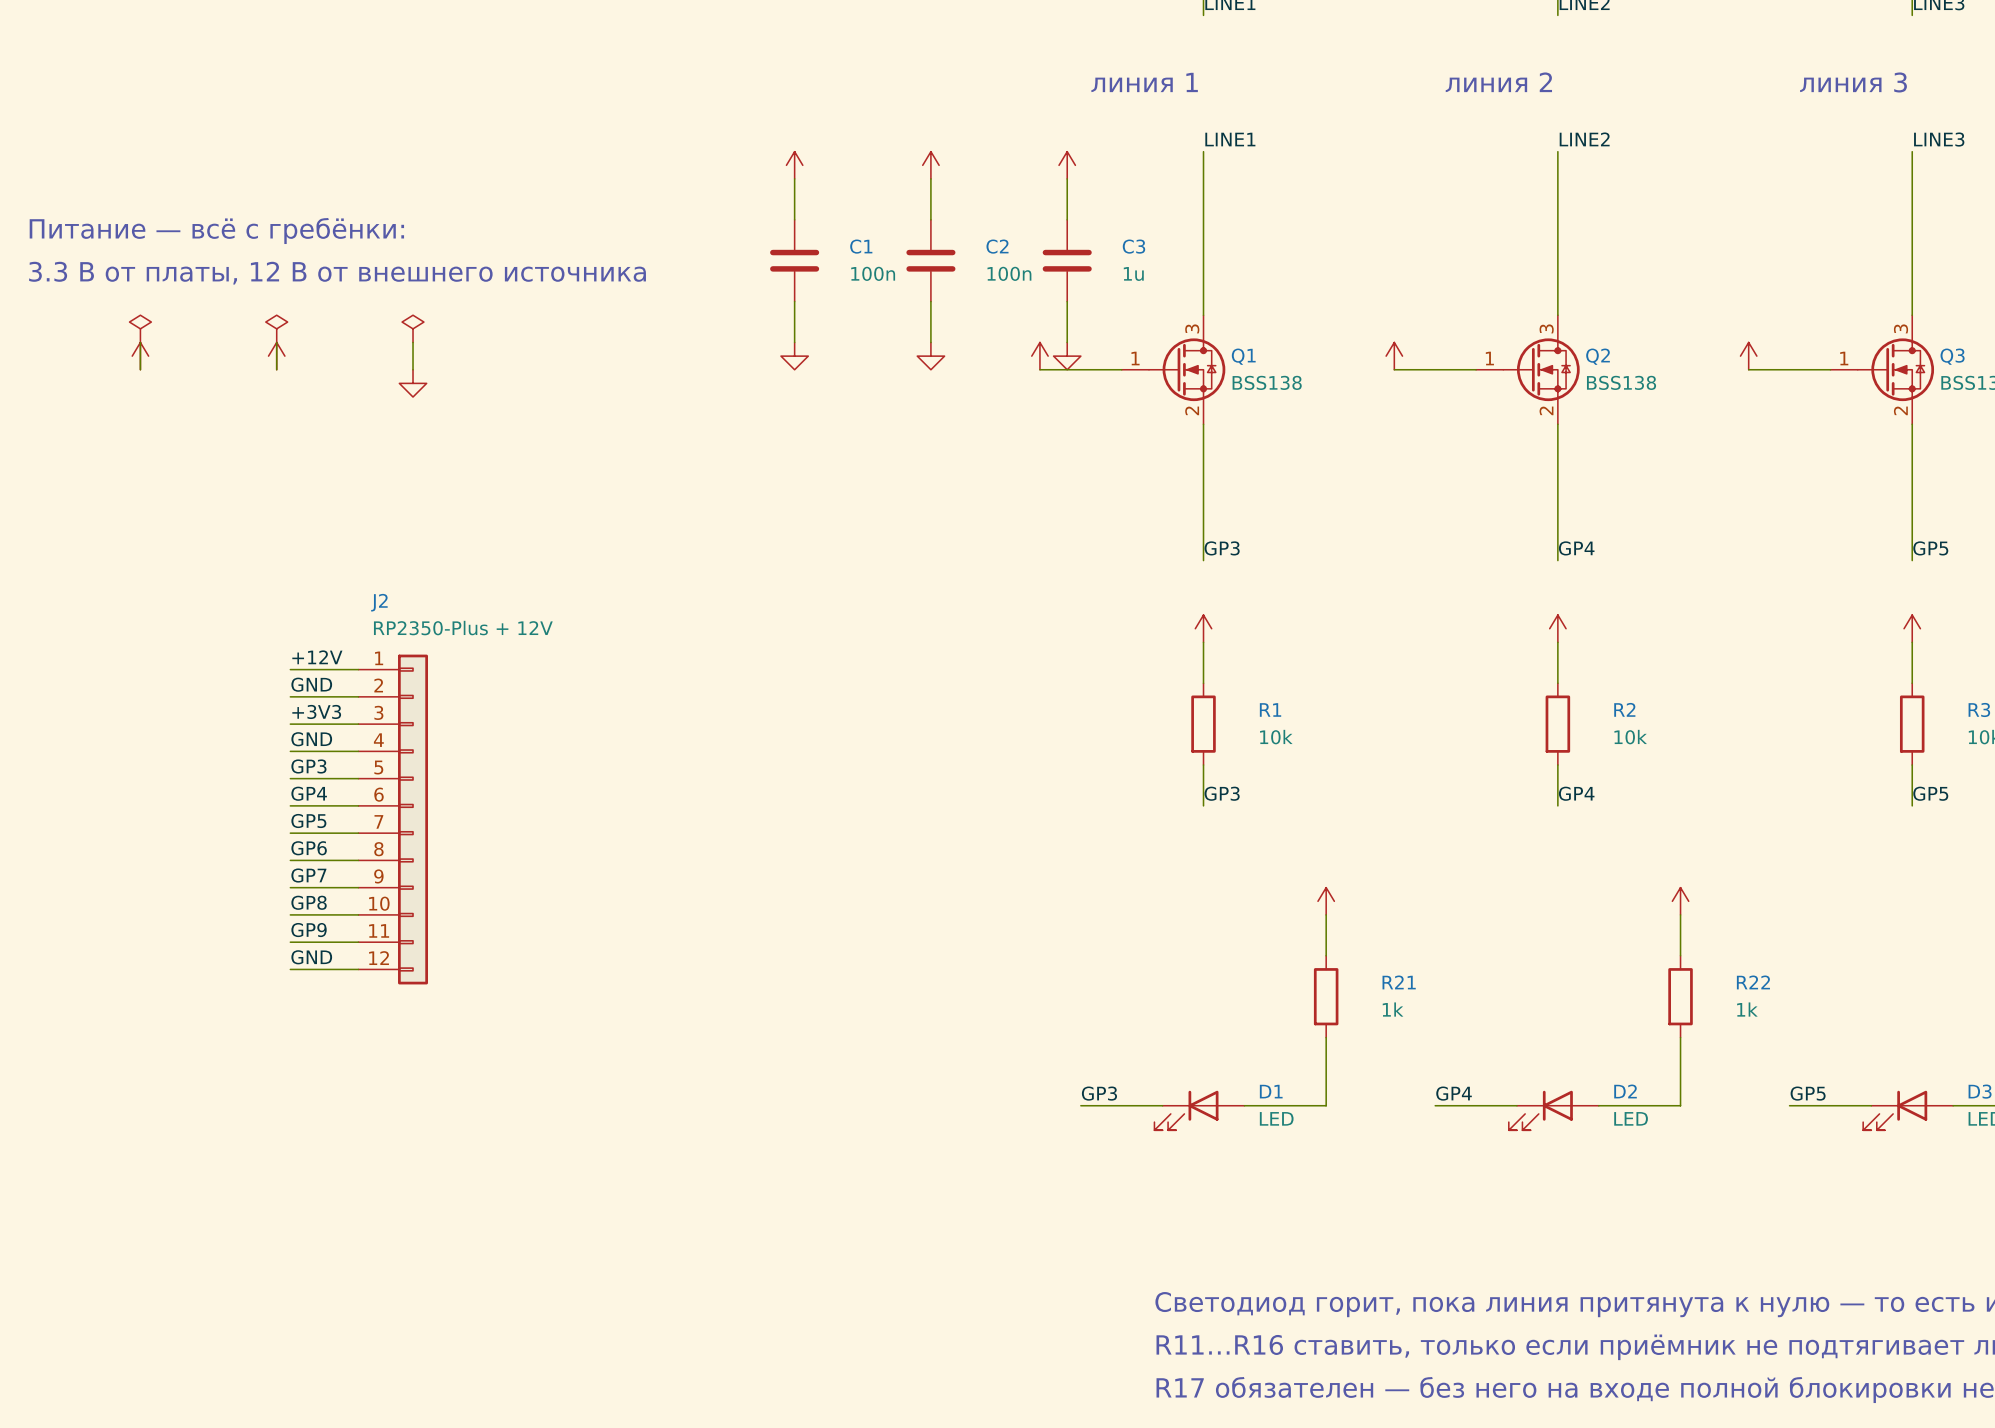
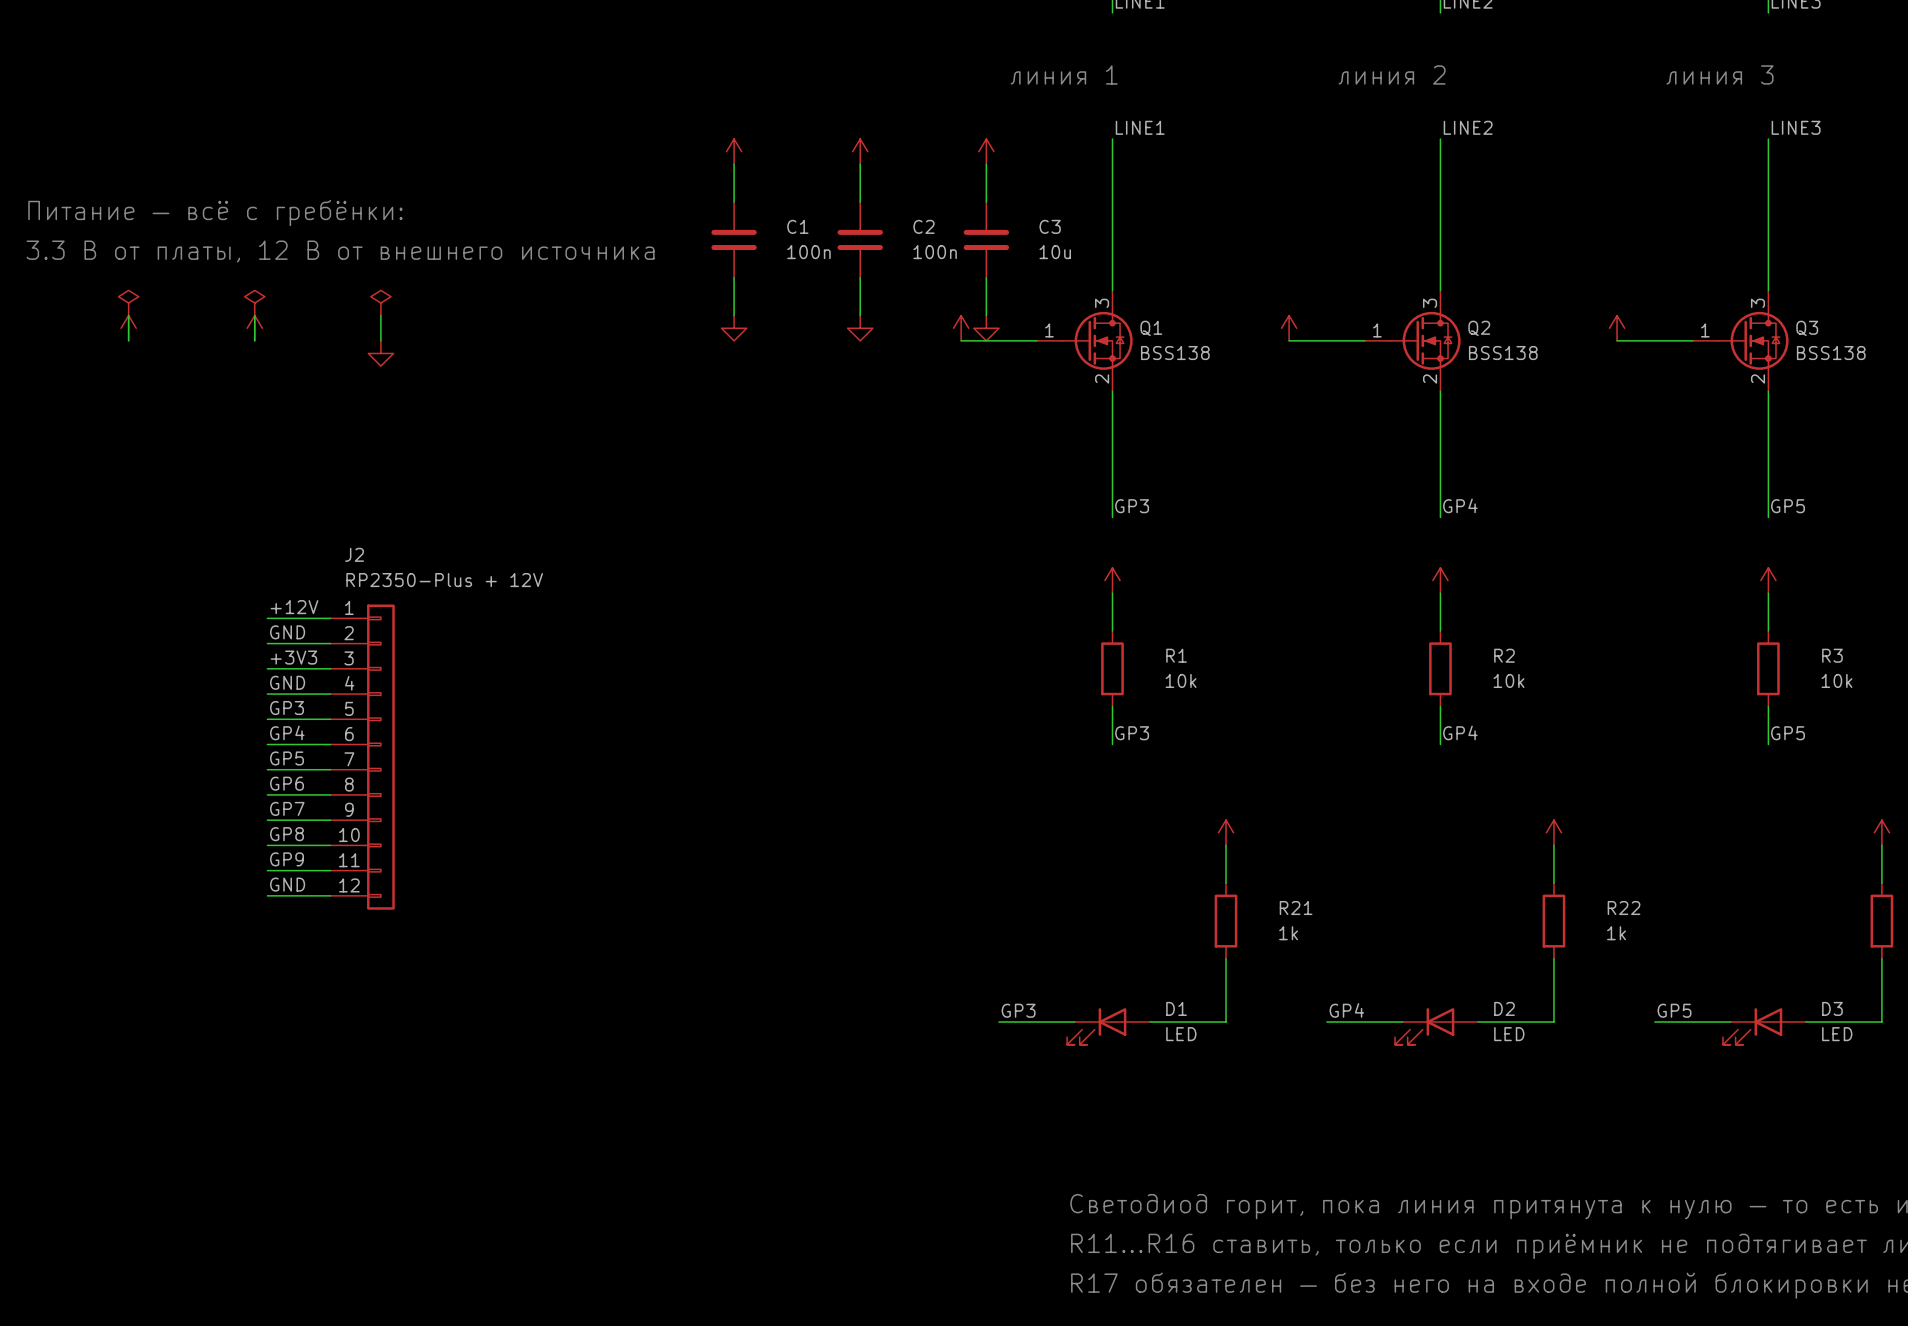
C3 value: 1u (1133, 273) -> 10u (1055, 252)

